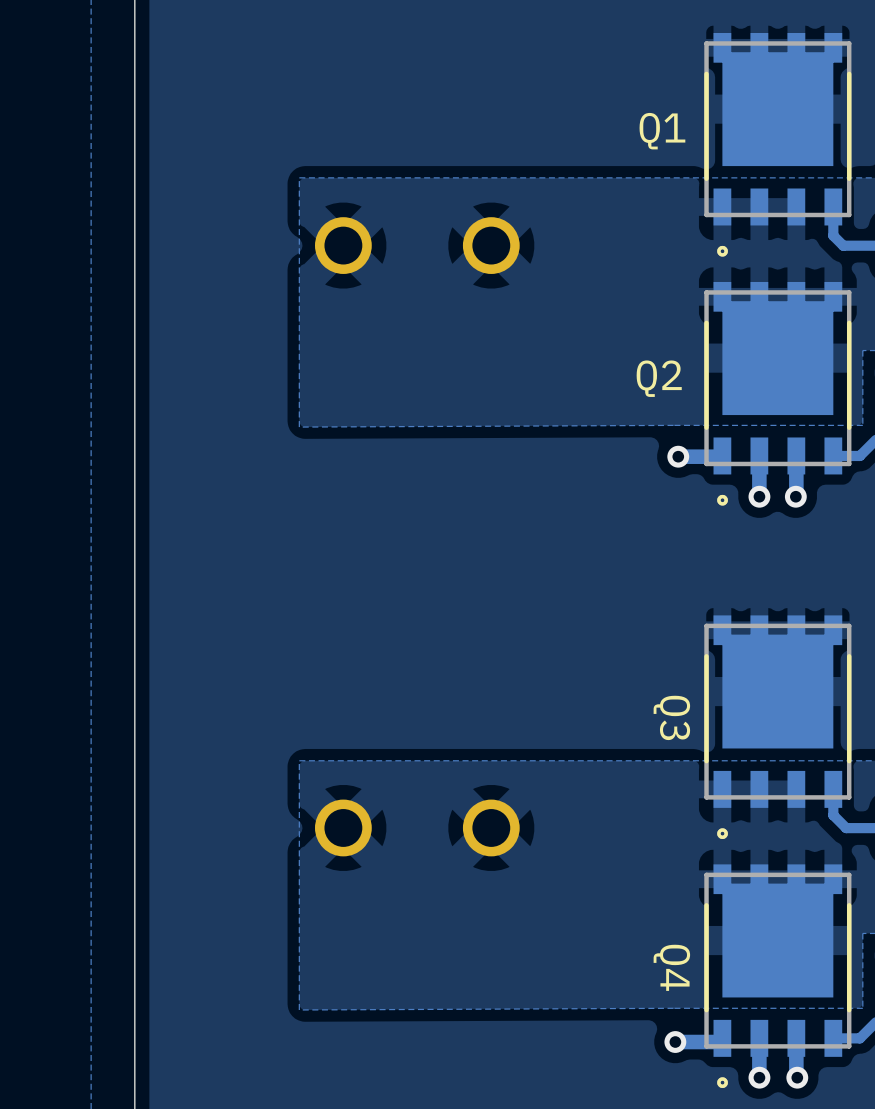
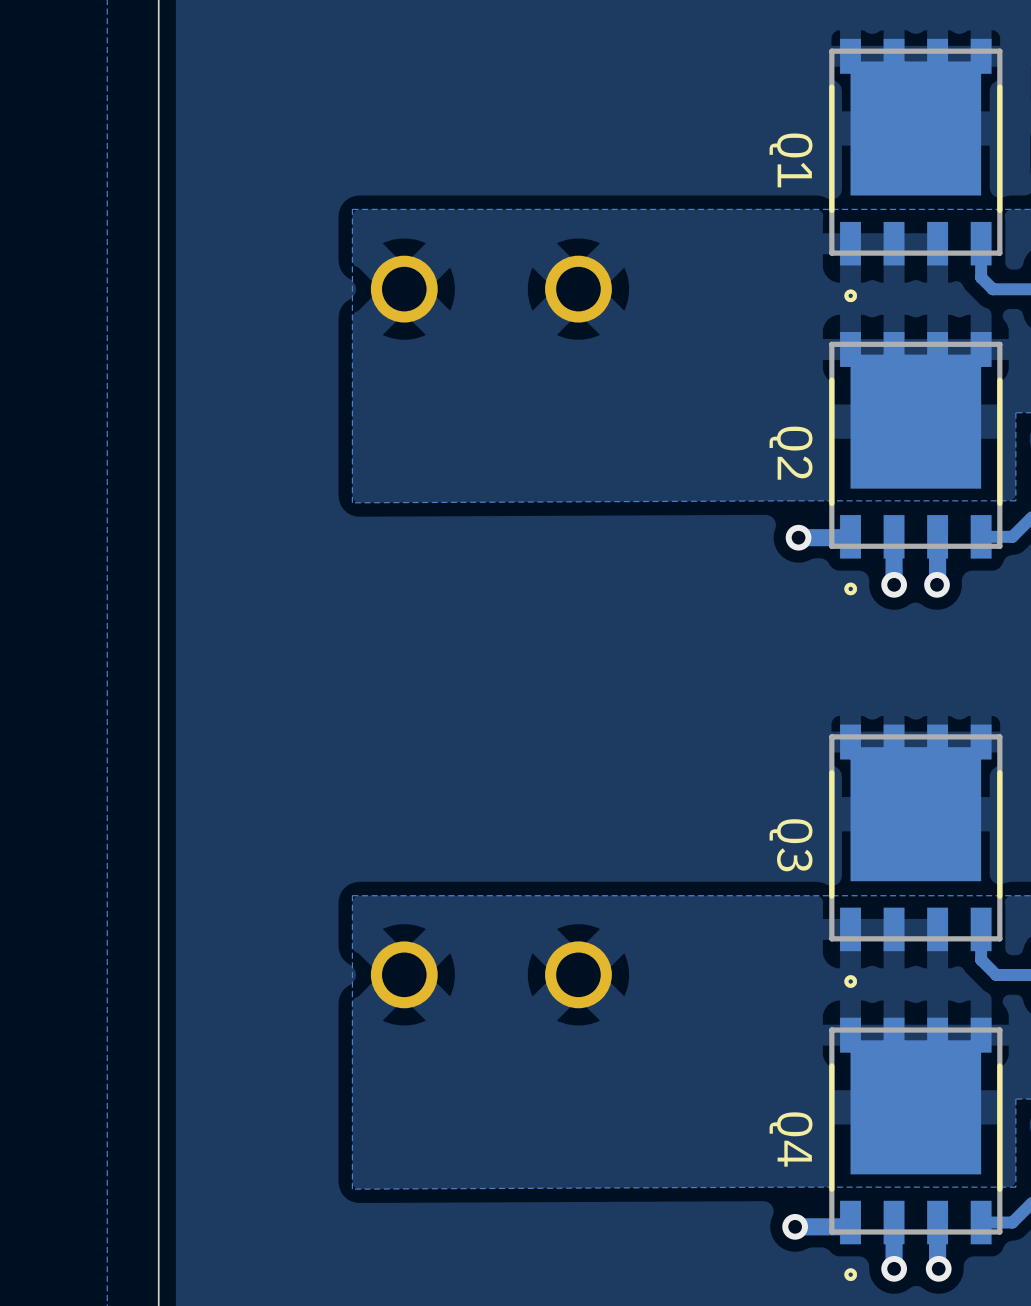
Q1 name rotation: 0° (662, 131) -> 90° clockwise (791, 160)
Q2 name rotation: 0° (659, 378) -> 90° clockwise (791, 453)

